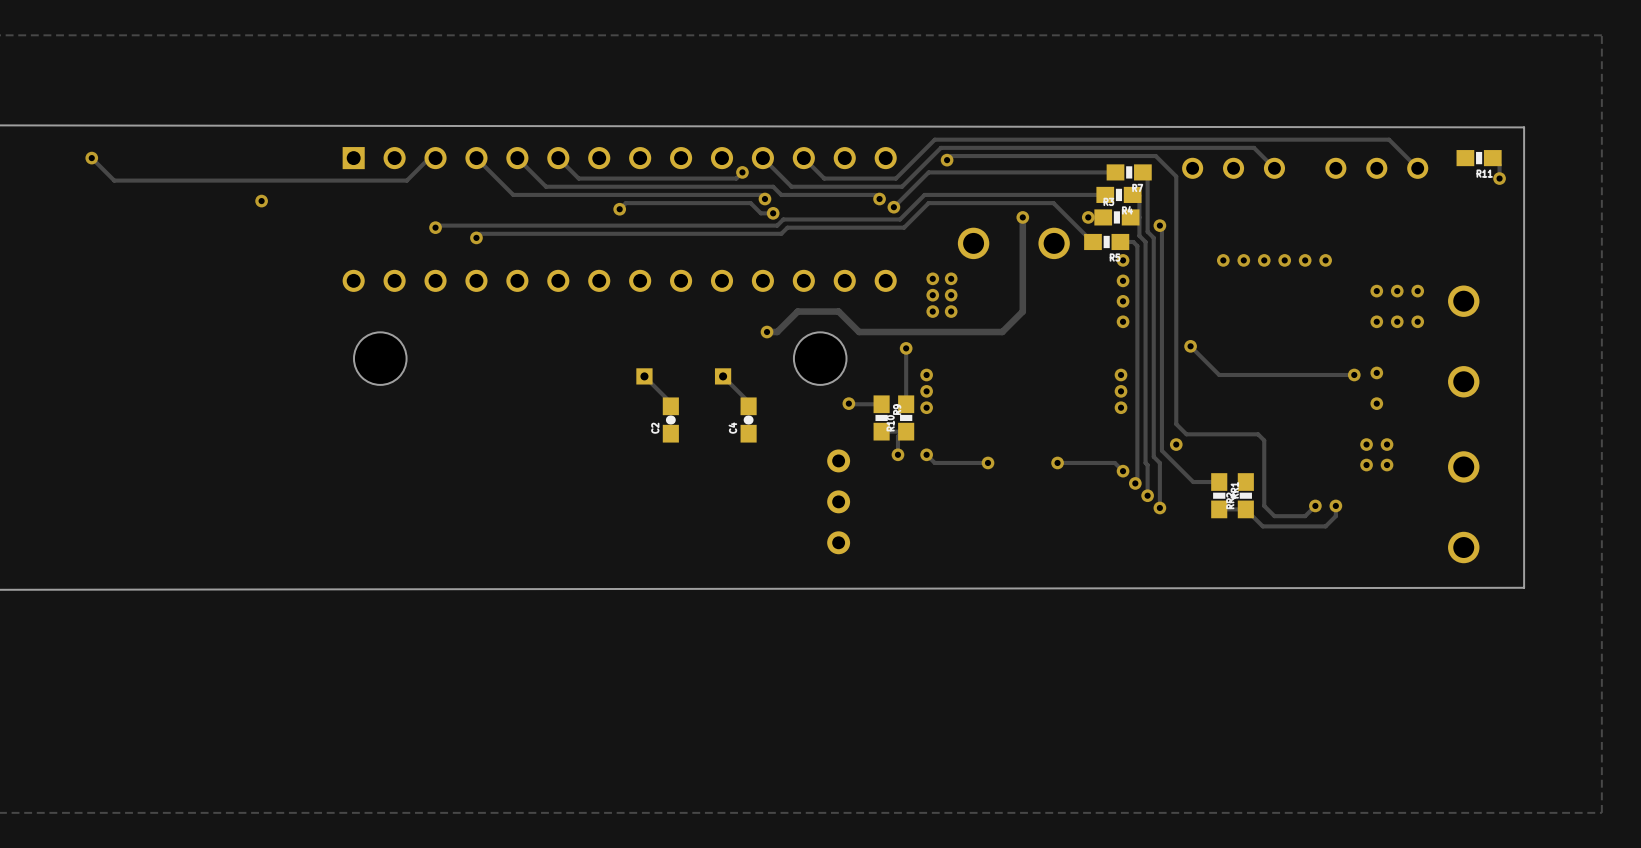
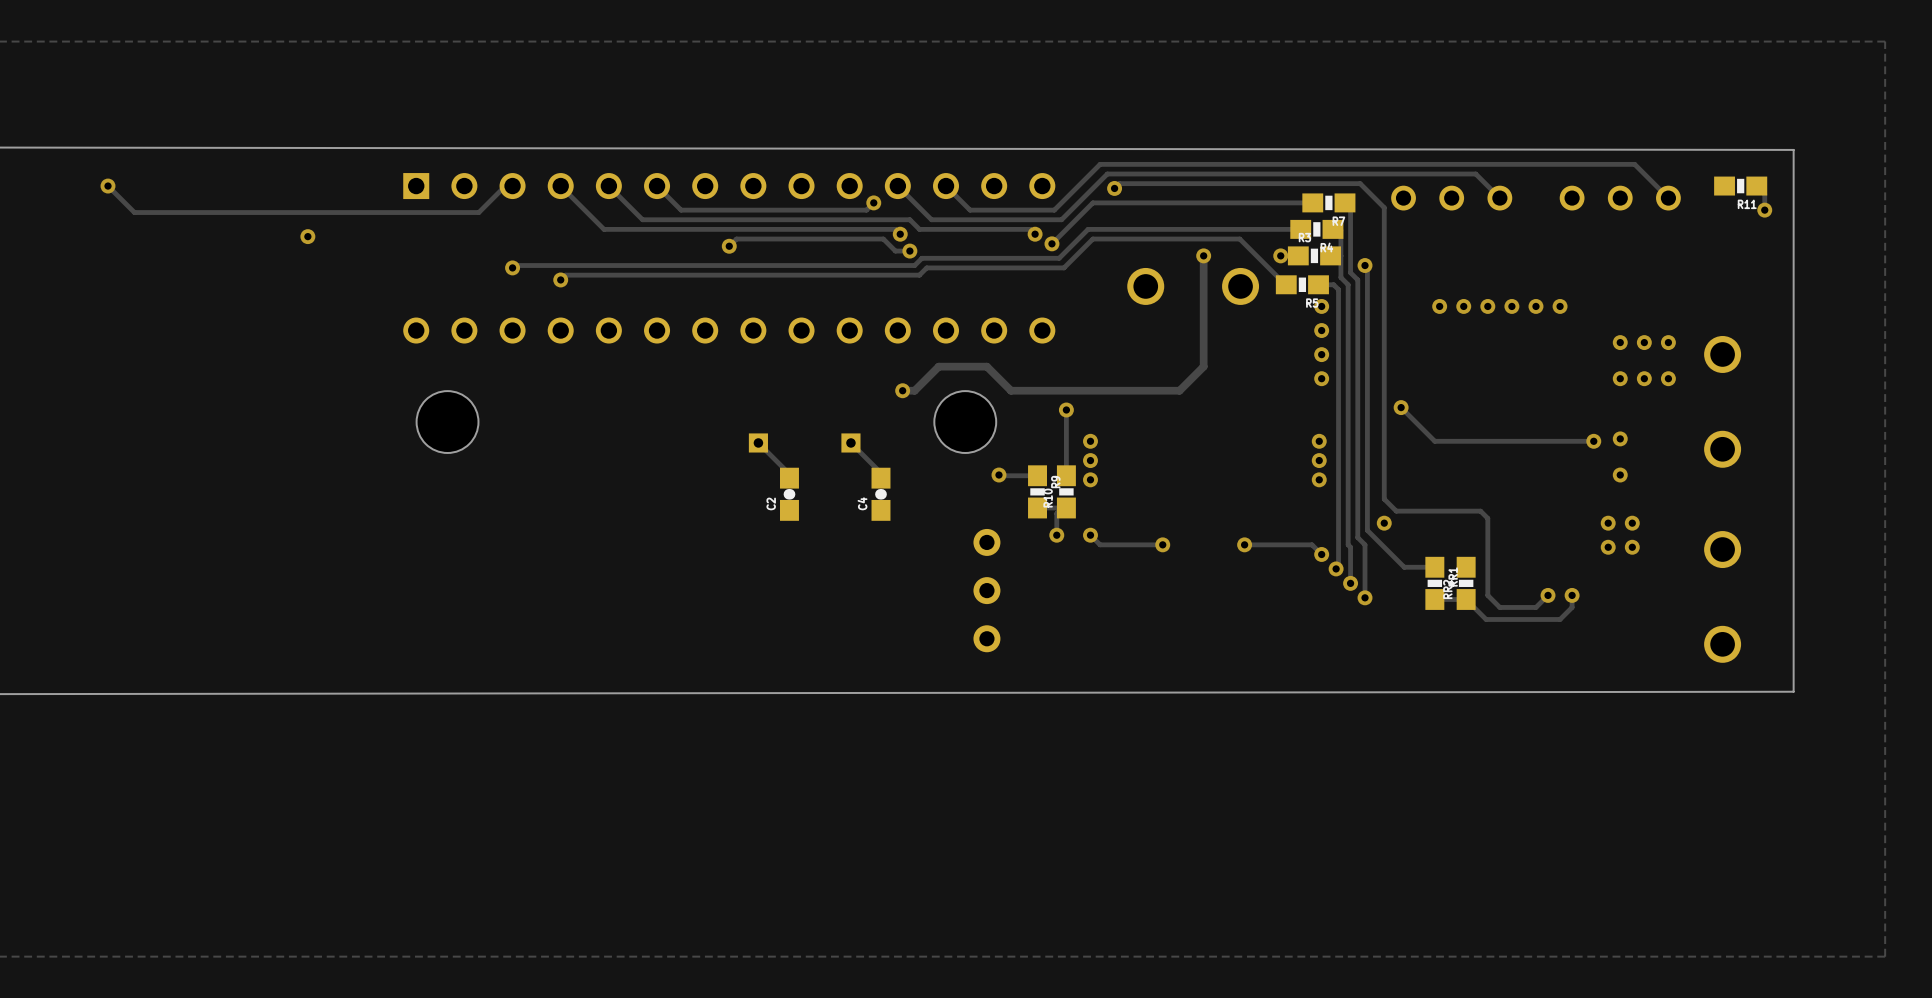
via: (932, 278) -> none
via: (951, 278) -> none
via: (932, 295) -> none
via: (951, 295) -> none
via: (932, 311) -> none
via: (951, 311) -> none

